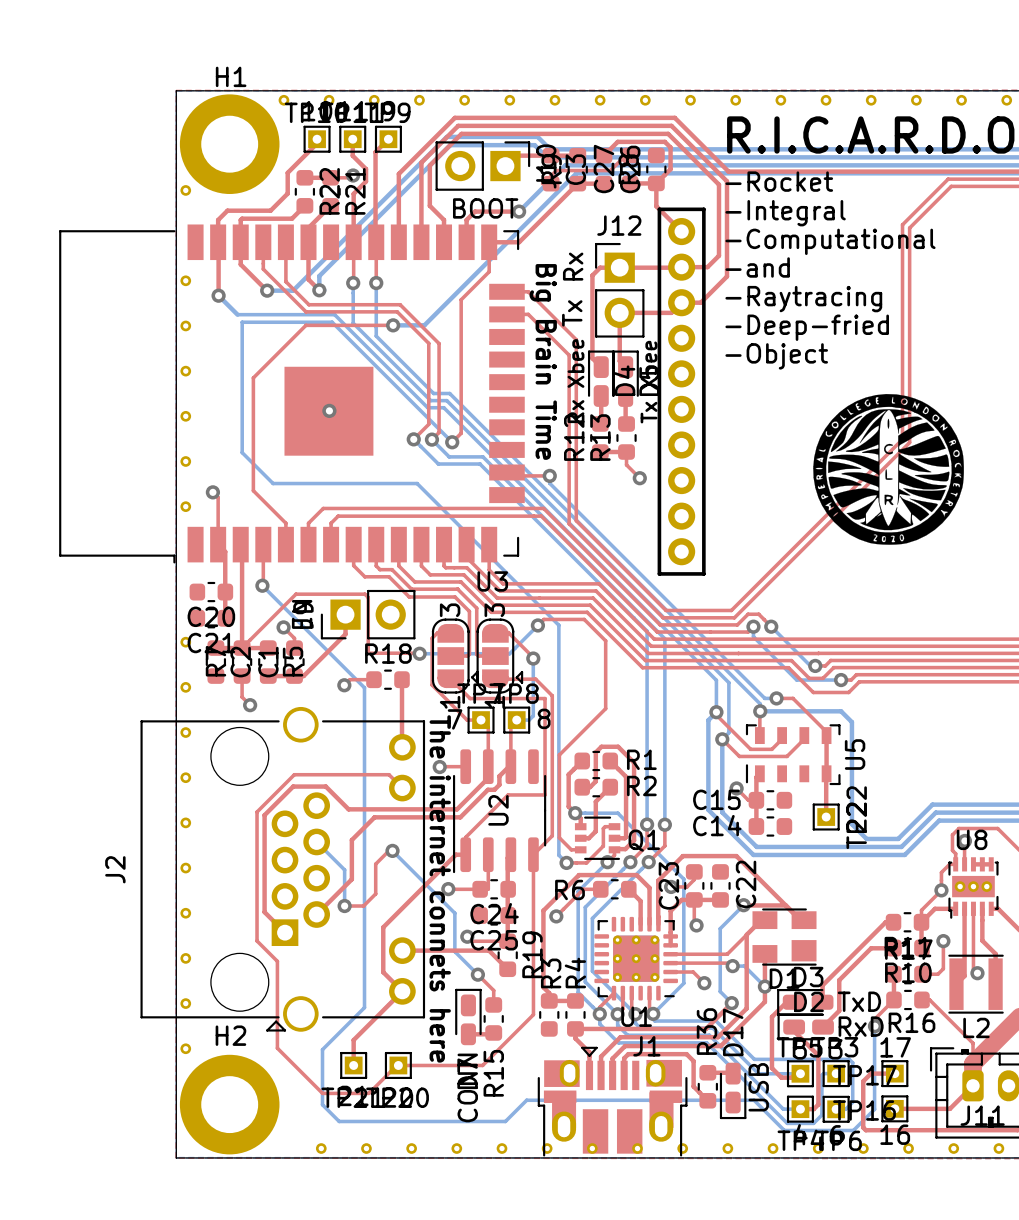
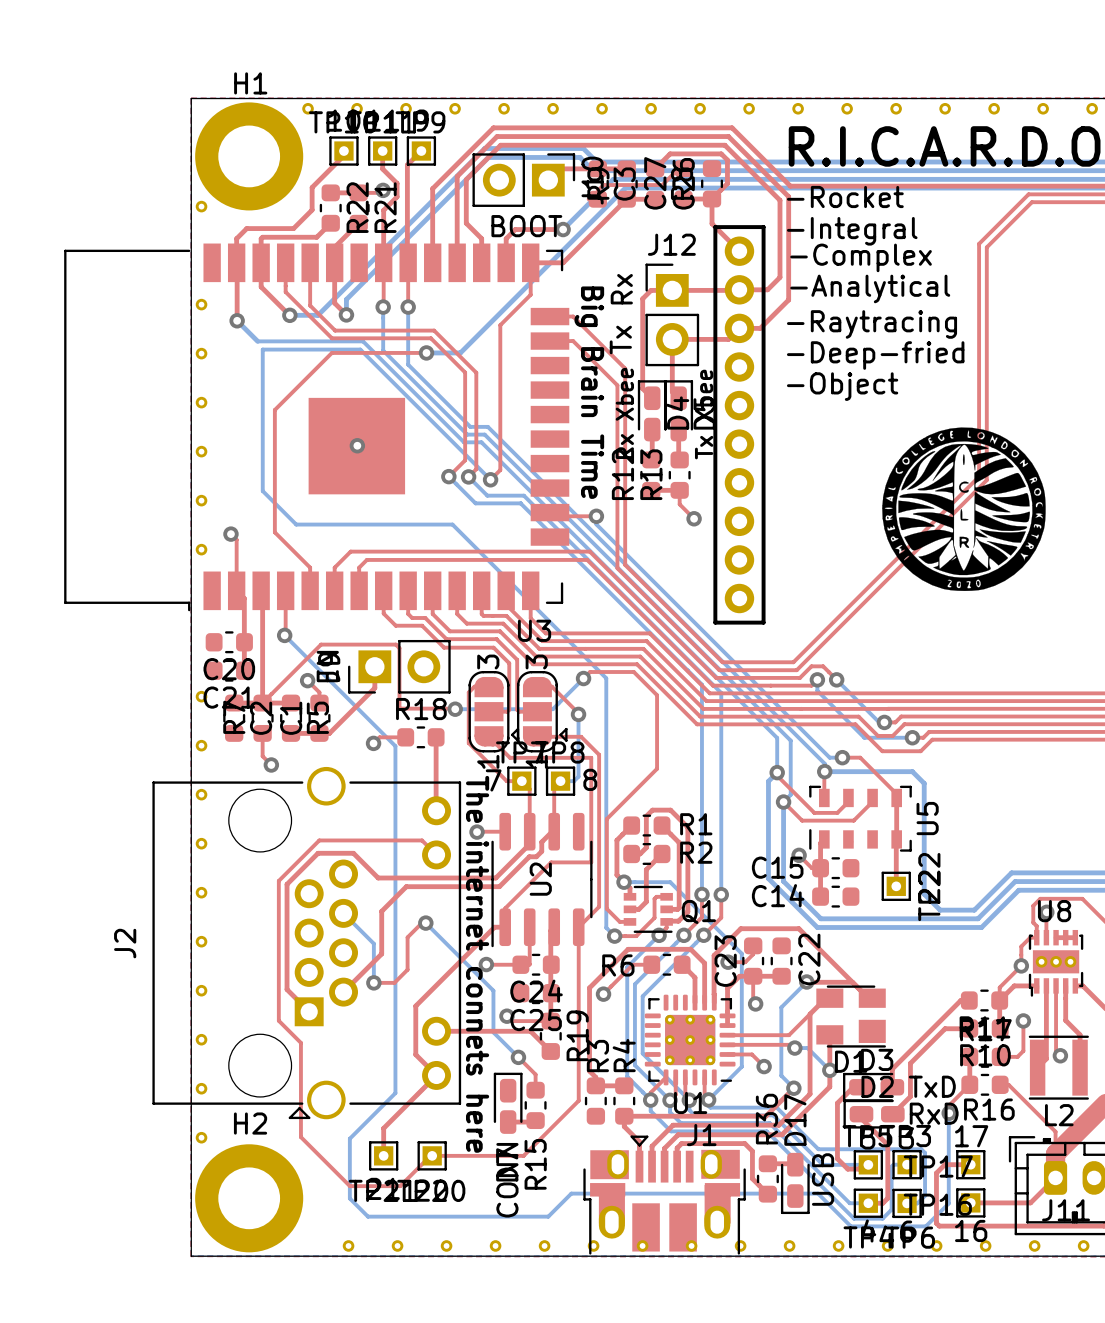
text: -Computational (830, 241) -> -Complex (861, 257)
text: -and (757, 267) -> -Analytical (870, 288)

